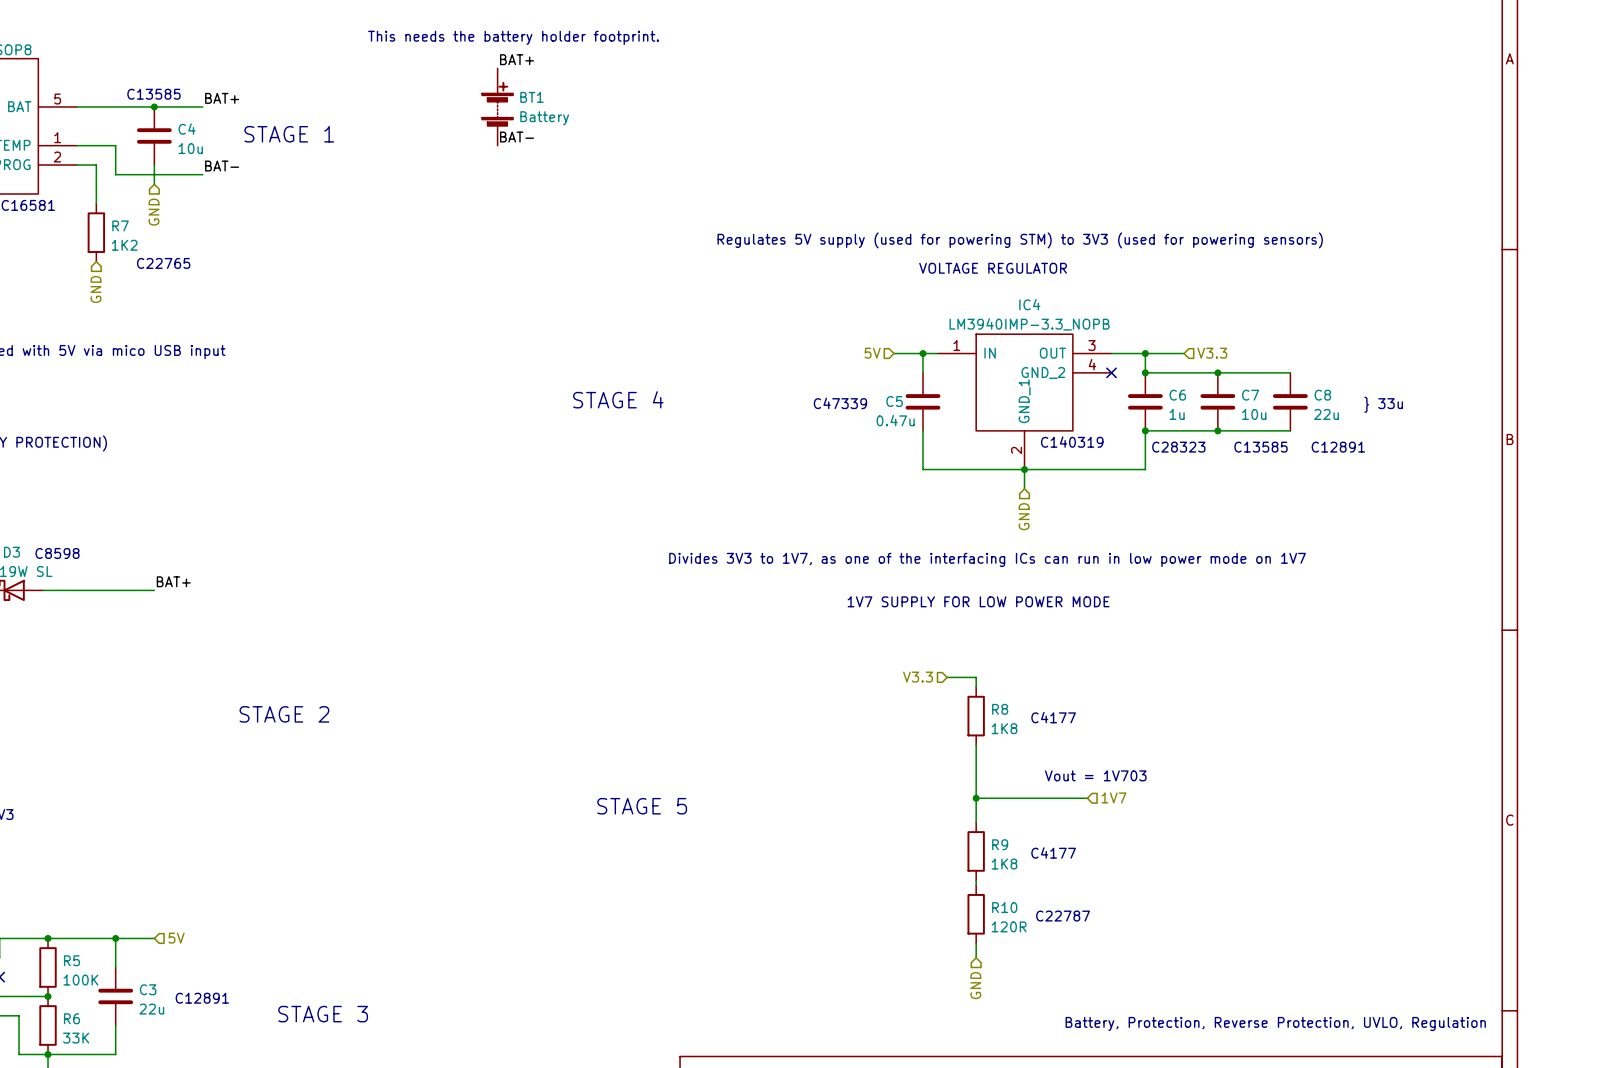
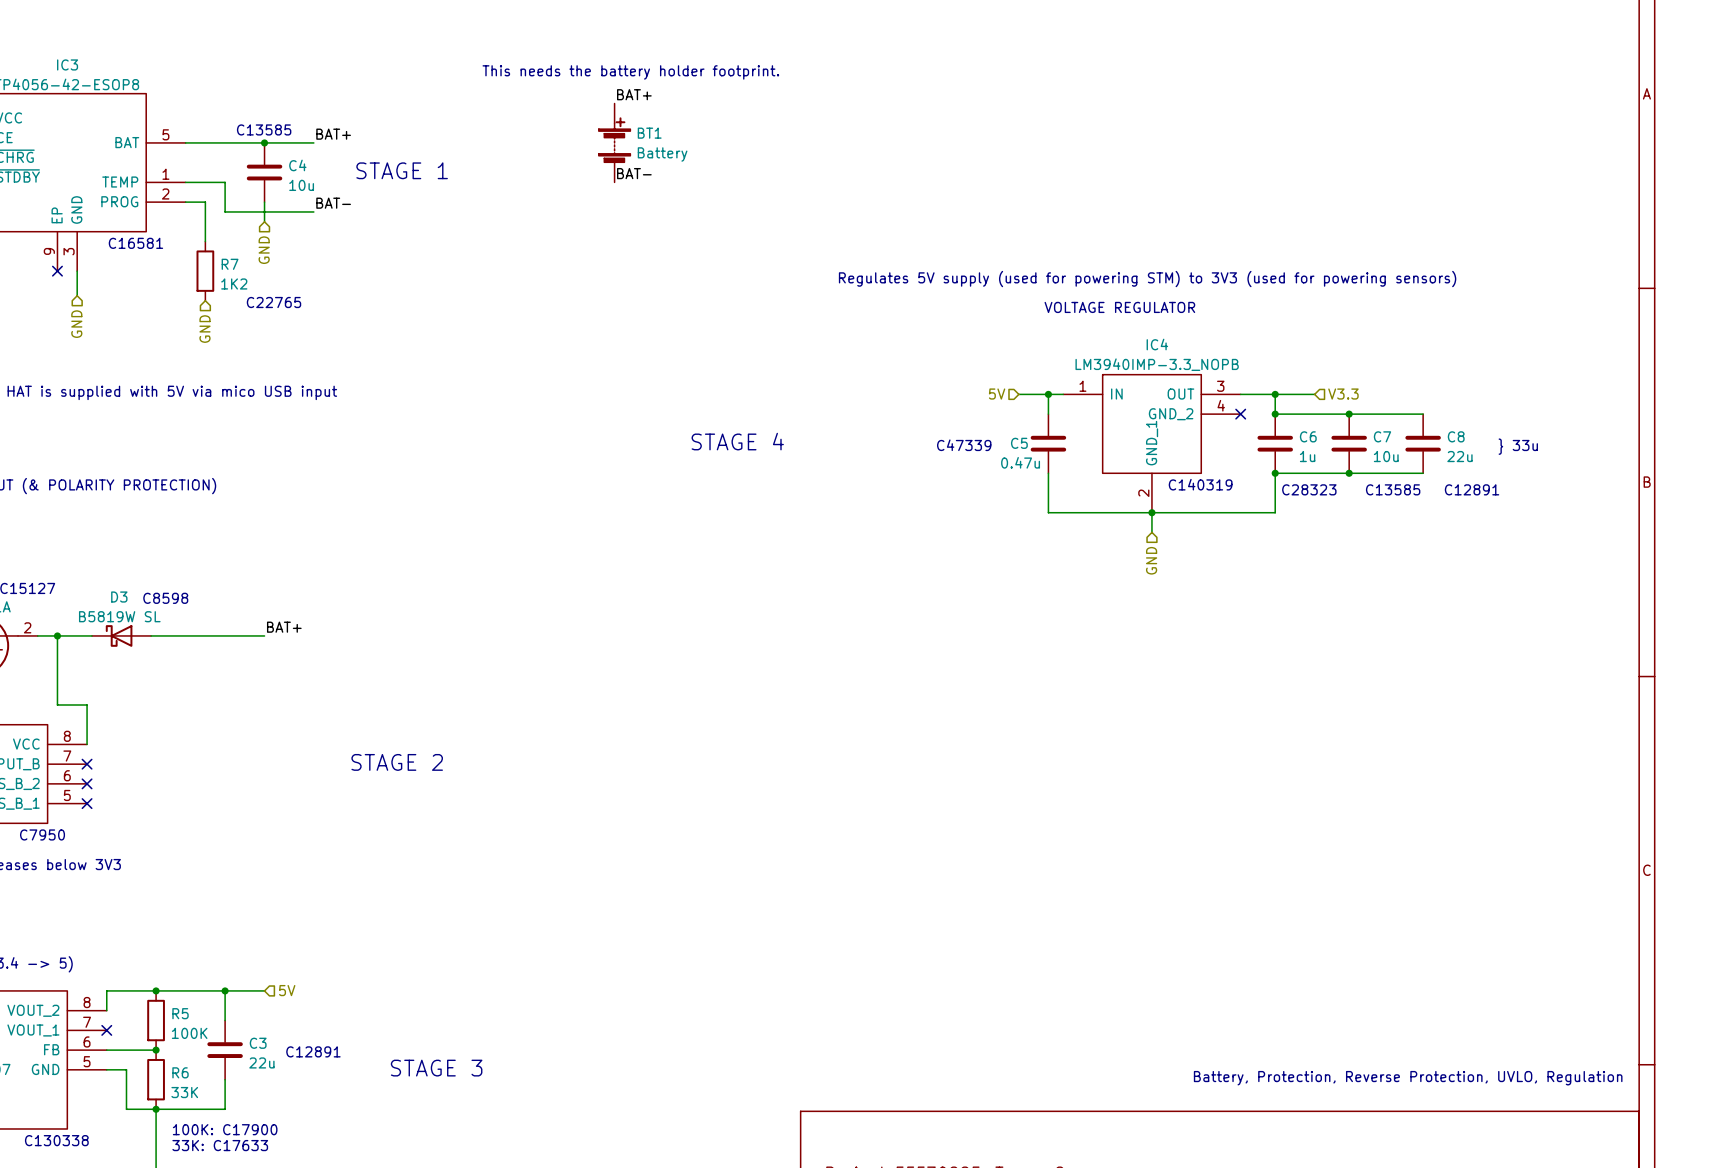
text: Divides 3V3 to 1V7, as one of the interfacing ICs can run in low power mode on 1V7 (987, 559) -> none
text: 1V7 SUPPLY FOR LOW POWER MODE (978, 601) -> none
hierarchical label: V3.3 (918, 677) -> none
wire: (947, 677) (976, 677) (976, 687) -> none
R8: 1K8 (976, 716) -> none
text: C4177 (1053, 717) -> none
wire: (976, 745) (976, 822) -> none
text: Vout = 1V703 (1095, 775) -> none
hierarchical label: 1V7 (1113, 797) -> none
wire: (976, 798) (1087, 798) -> none
junction: (976, 798) -> none
text: STAGE 5 (642, 806) -> none
R9: 1K8 (976, 851) -> none
text: C4177 (1053, 852) -> none
wire: (976, 880) (976, 885) -> none
R10: 120R (976, 914) -> none
text: C22787 (1063, 916) -> none
wire: (976, 943) (976, 957) -> none
hierarchical label: GND (975, 985) -> none

